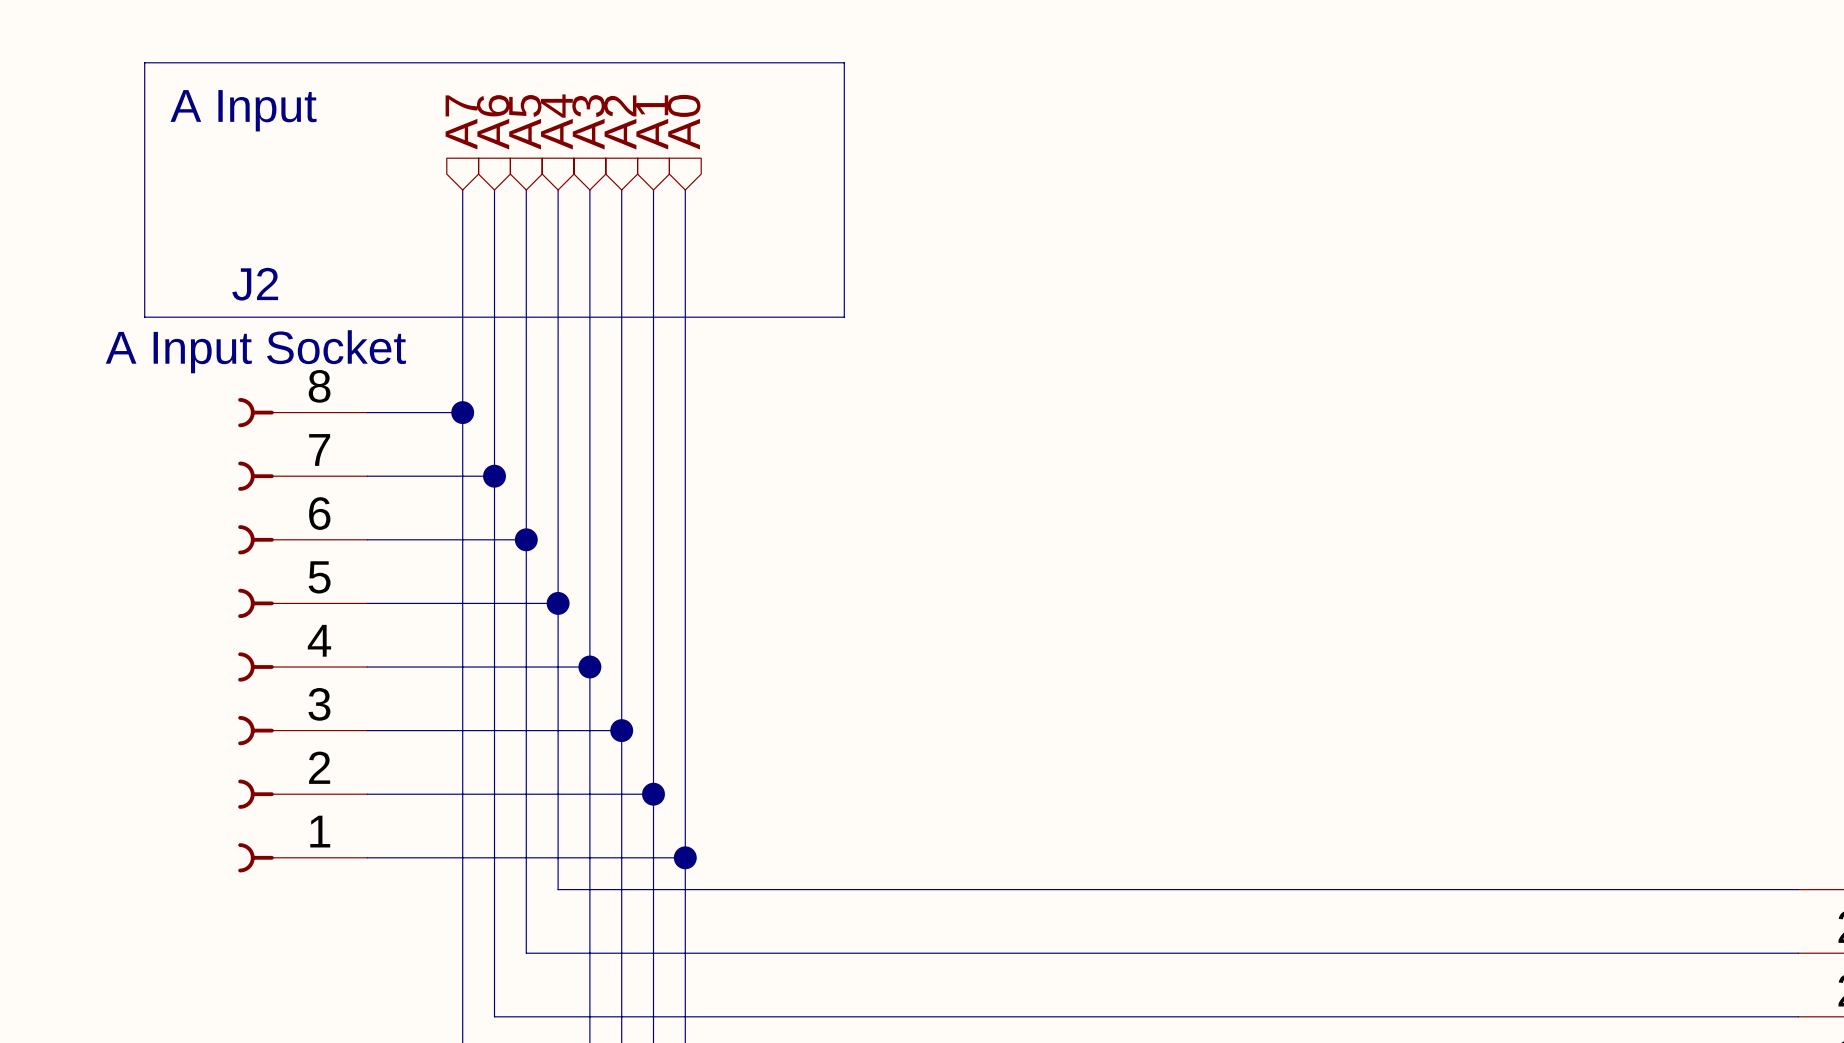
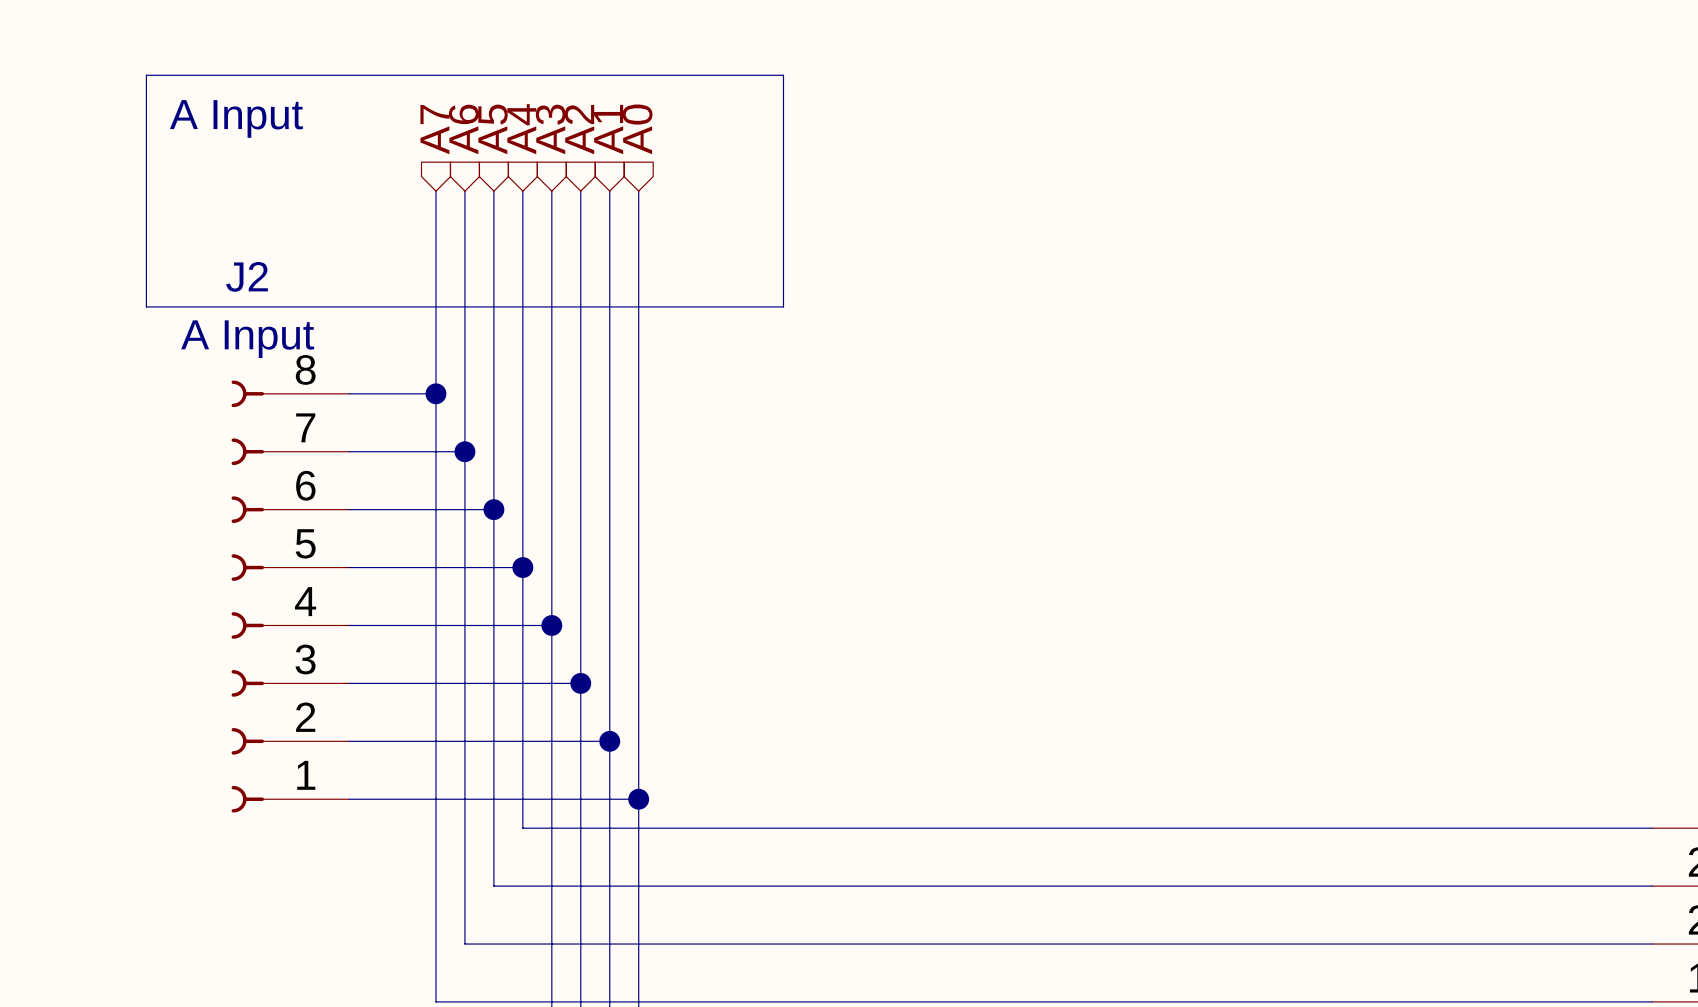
J2 value: A Input Socket (255, 351) -> A Input (247, 339)

